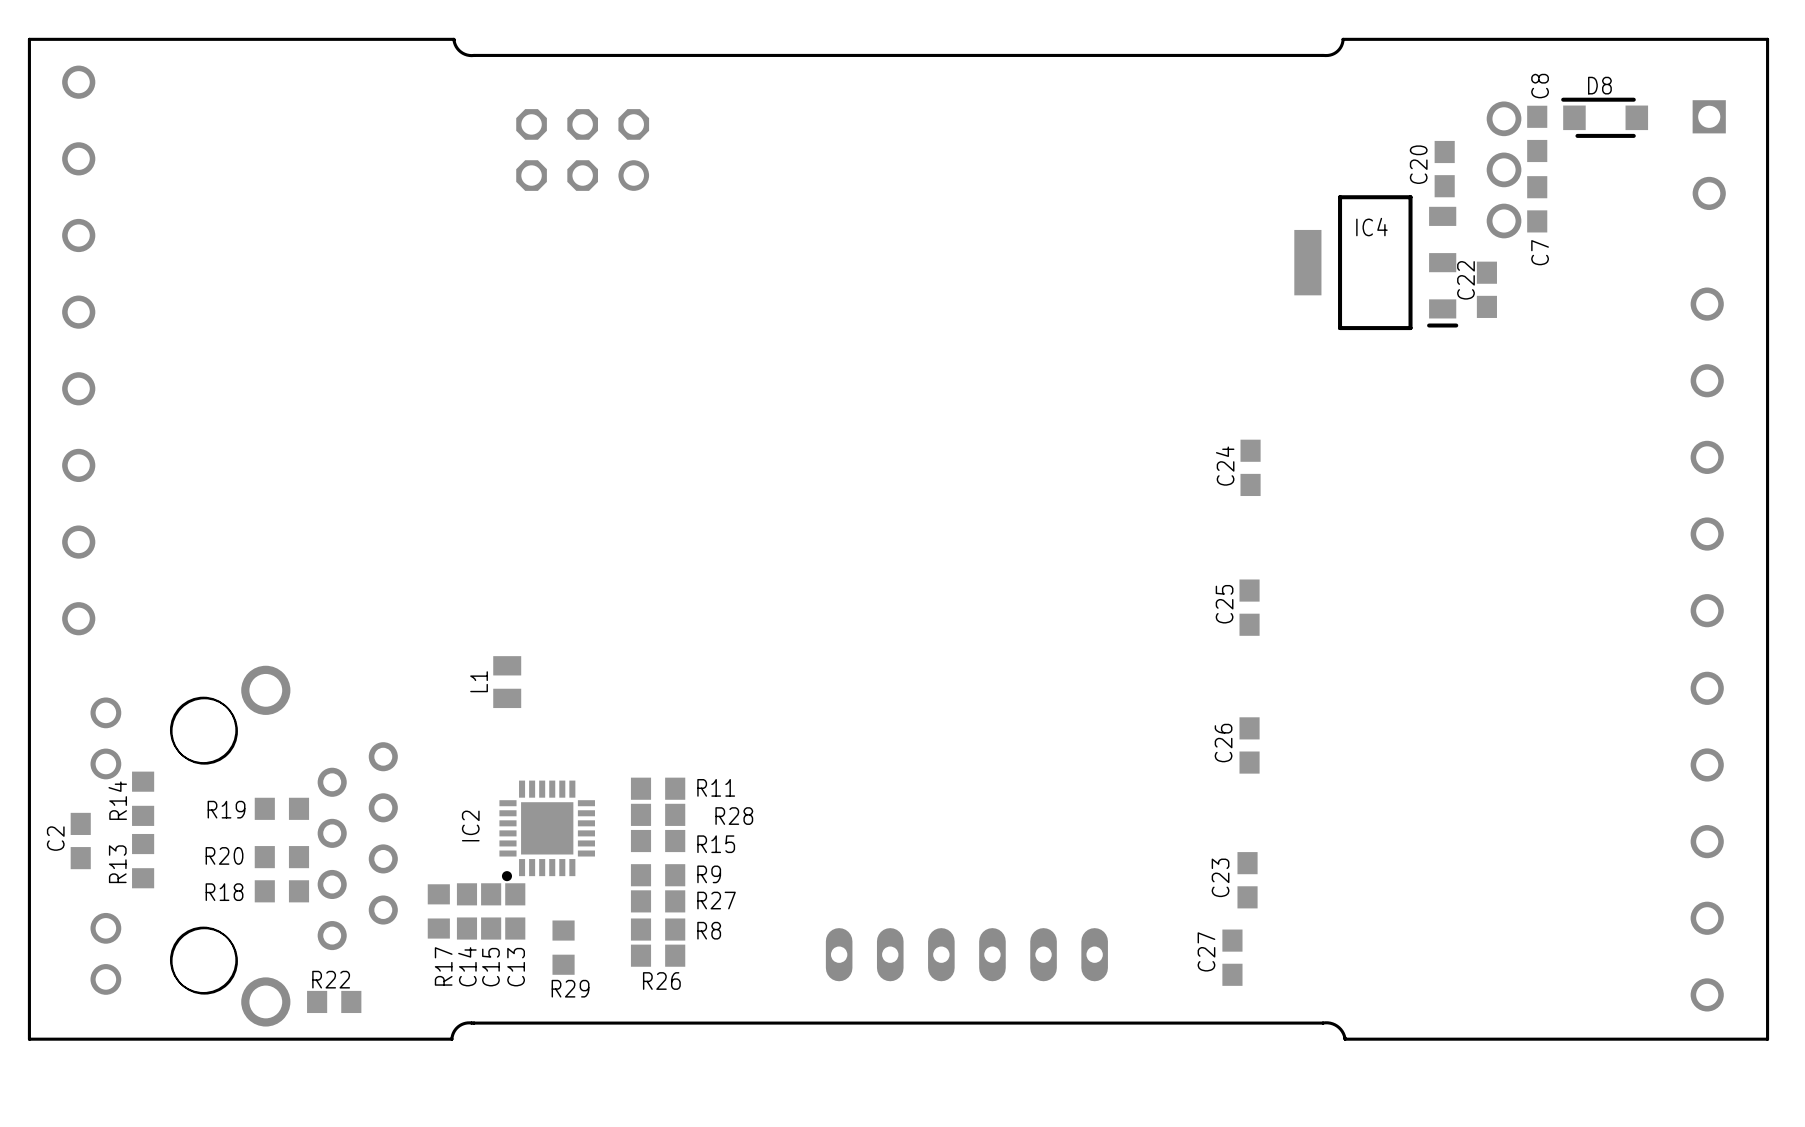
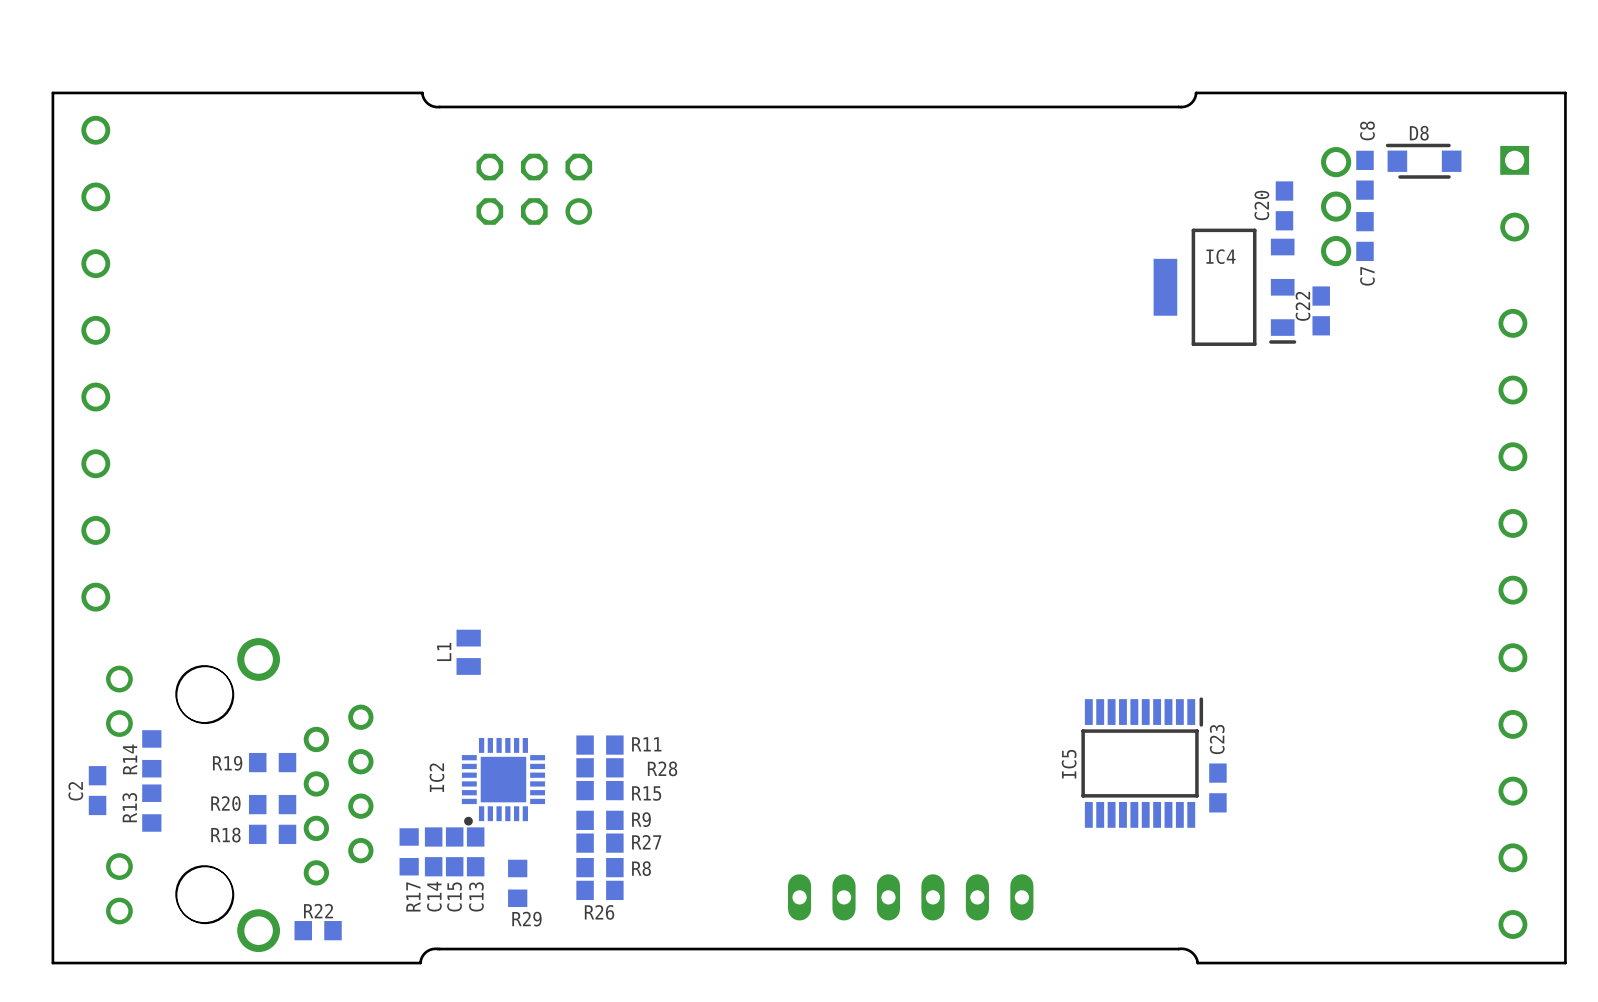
C24: (1250, 467) -> none
C25: (1249, 607) -> none
C26: (1249, 745) -> none
IC5: none -> (1142, 762)
C23 name position: C23 (1220, 877) -> C23 (1217, 739)
C23 position: (1247, 880) -> (1217, 787)
part position: (966, 954) -> (910, 897)
C27: (1232, 957) -> none

